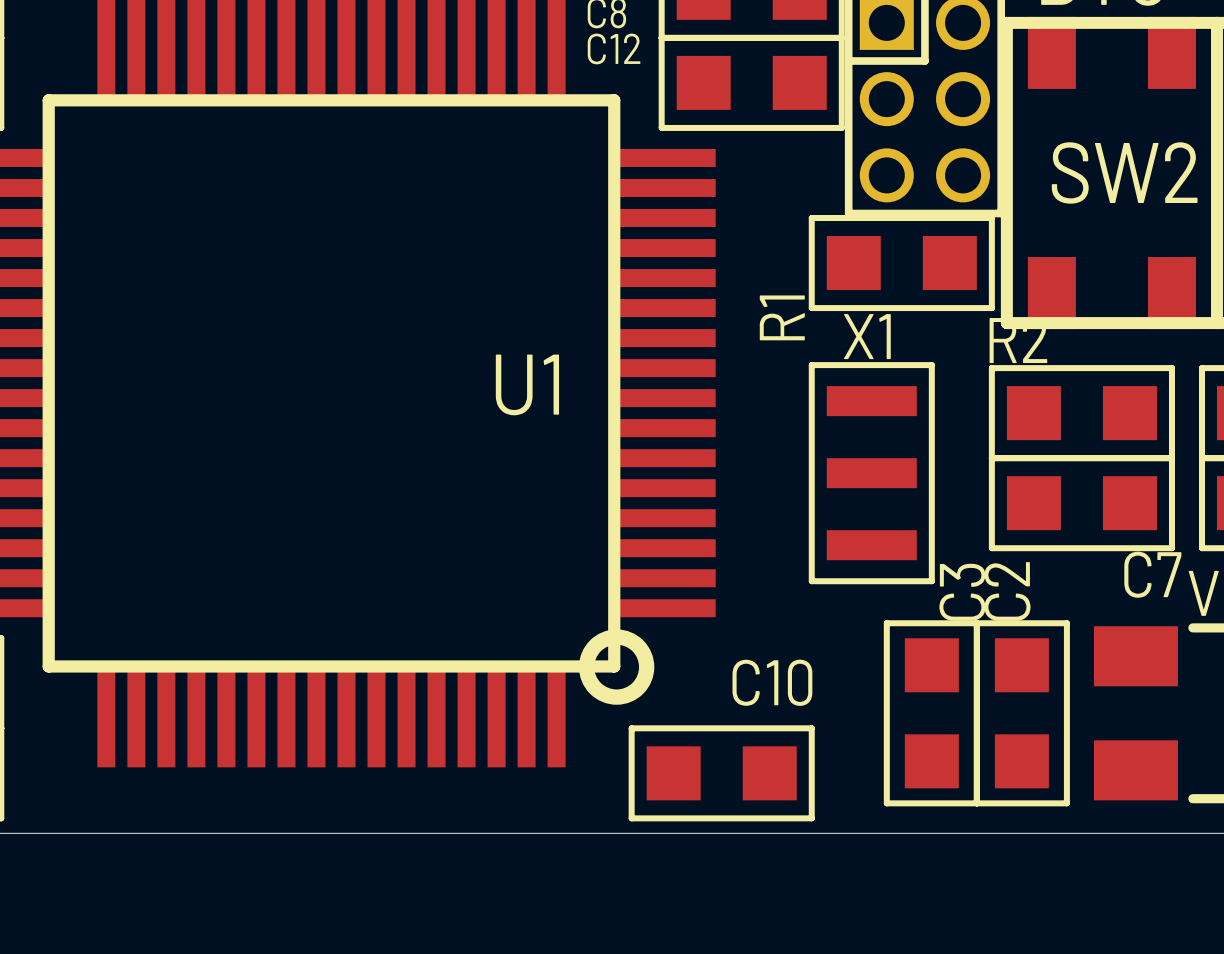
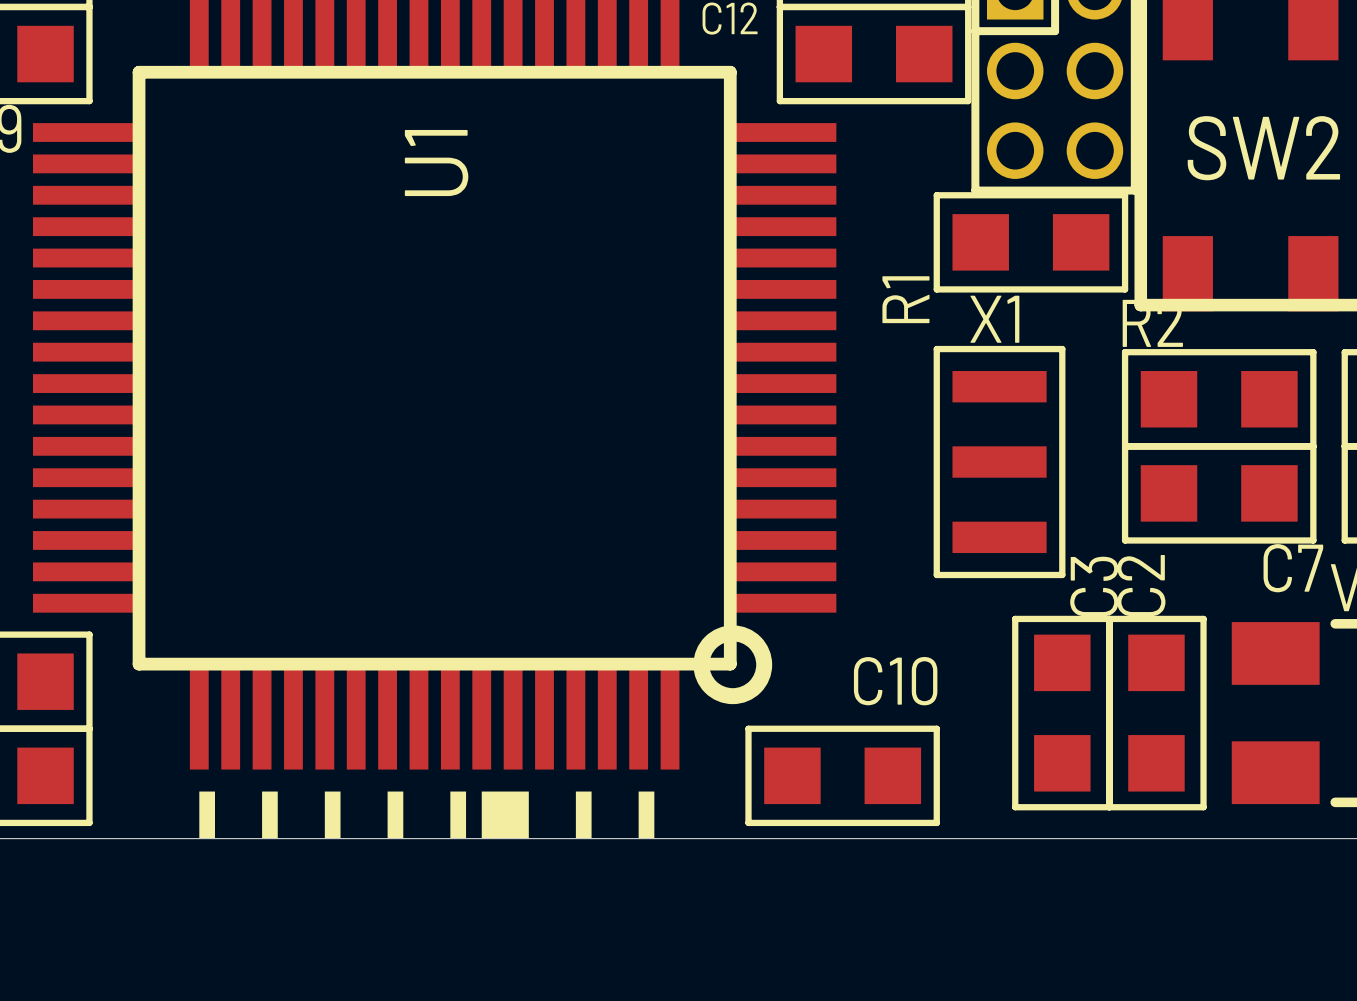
U1 name rotation: 0° (527, 384) -> 90° counterclockwise (436, 163)
U1 name position: U1 (527, 384) -> U1 (436, 163)
drawing: none -> [199, 791, 655, 839]

